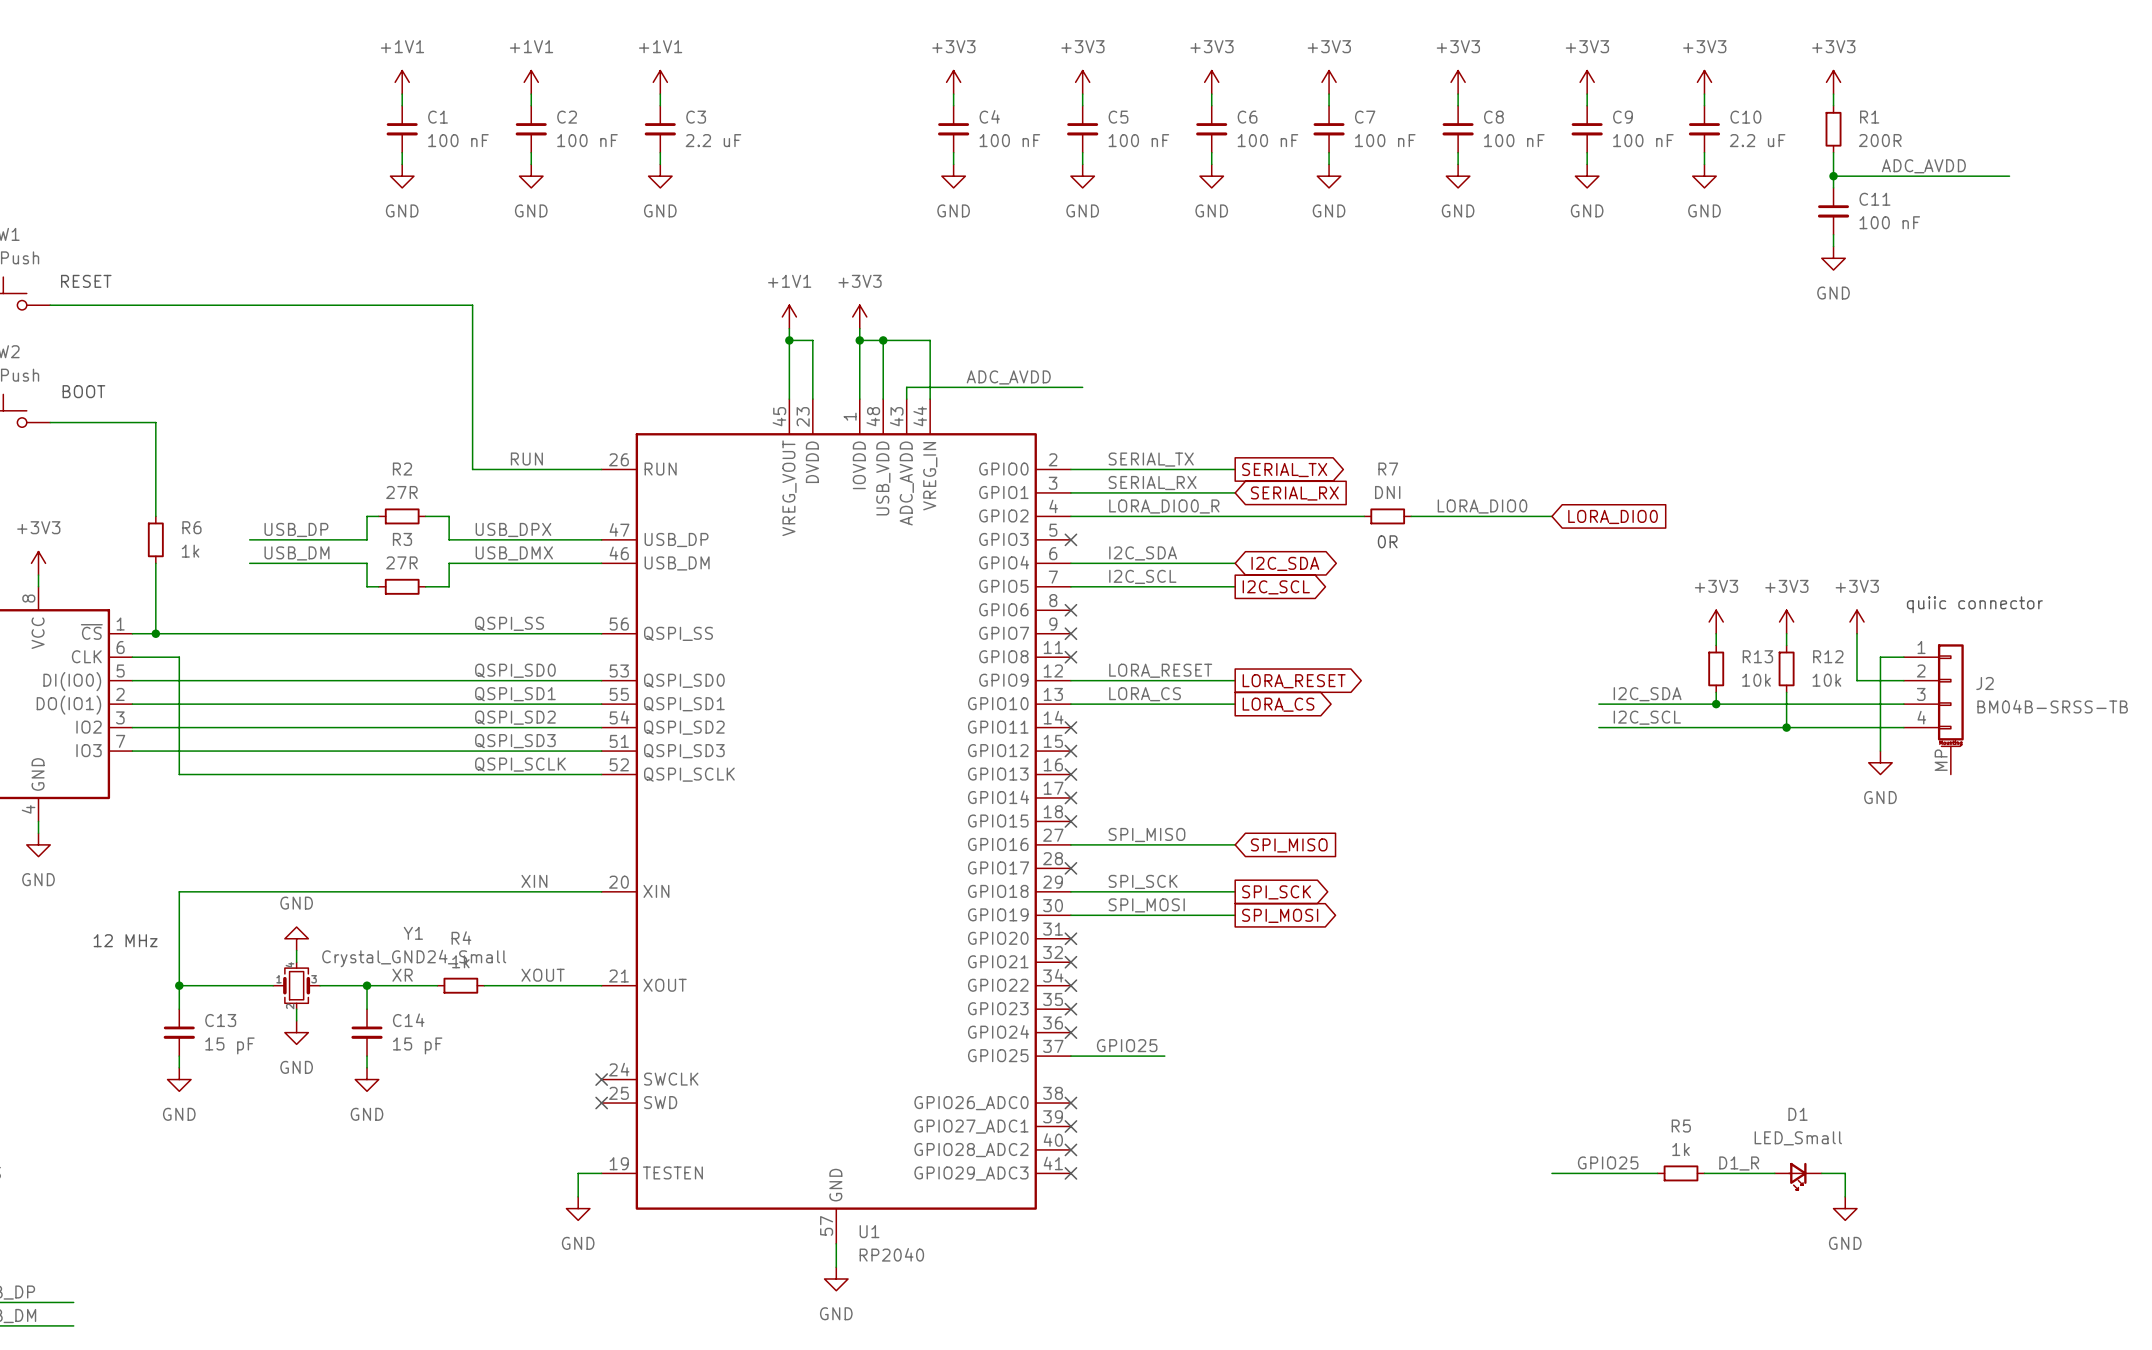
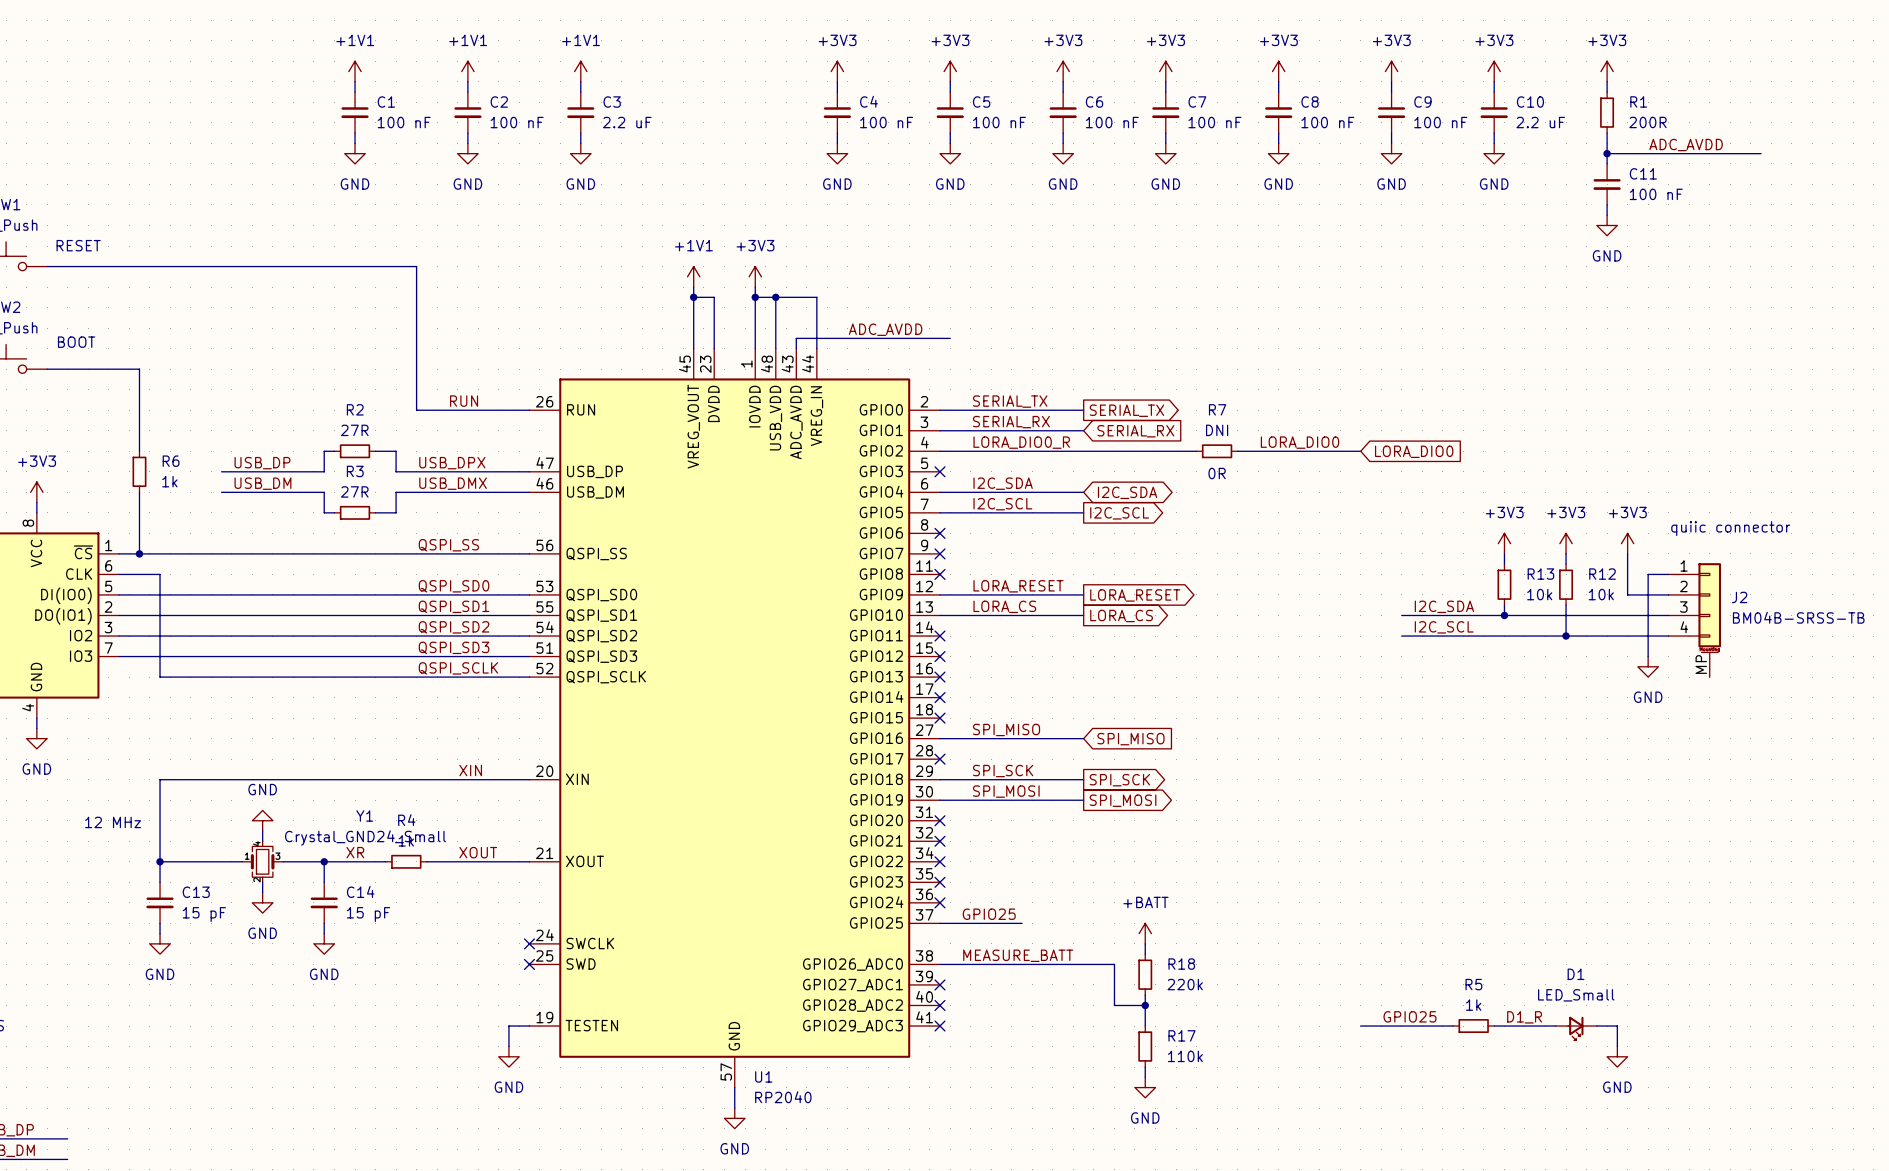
power symbol: none -> +BATT (1145, 933)
wire: none -> (1145, 943) (1145, 954)
label: none -> MEASURE_BATT (1018, 955)
wire: none -> (940, 964) (1114, 964) (1114, 1005) (1145, 1005)
no-connect mark: (1070, 1103) -> none
R18: none -> 220k (1145, 974)
wire: none -> (1145, 995) (1145, 1026)
junction: none -> (1145, 1005)
R17: none -> 110k (1145, 1046)
wire: none -> (1145, 1067) (1145, 1077)
power symbol: none -> GND (1145, 1087)

